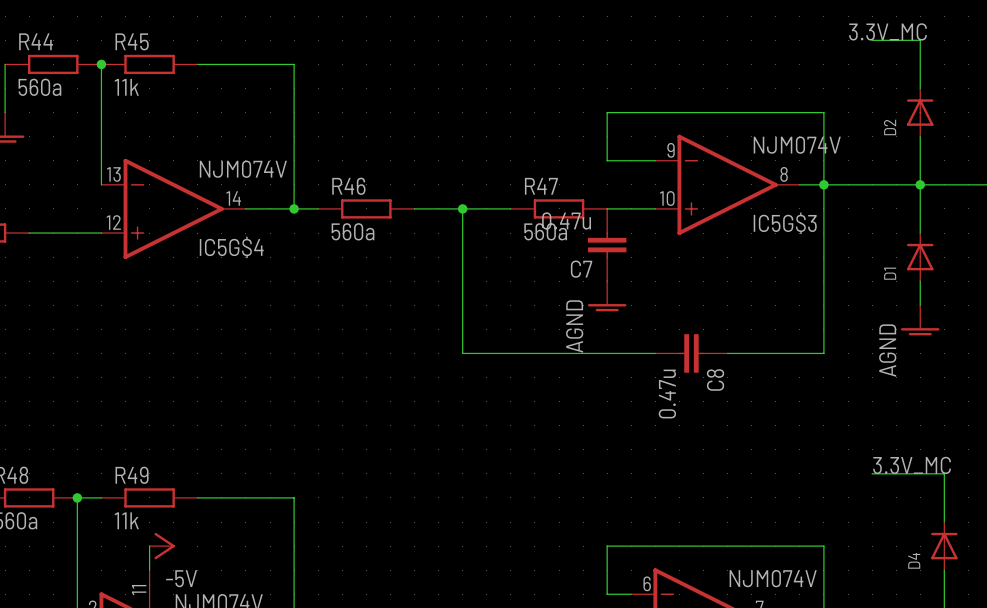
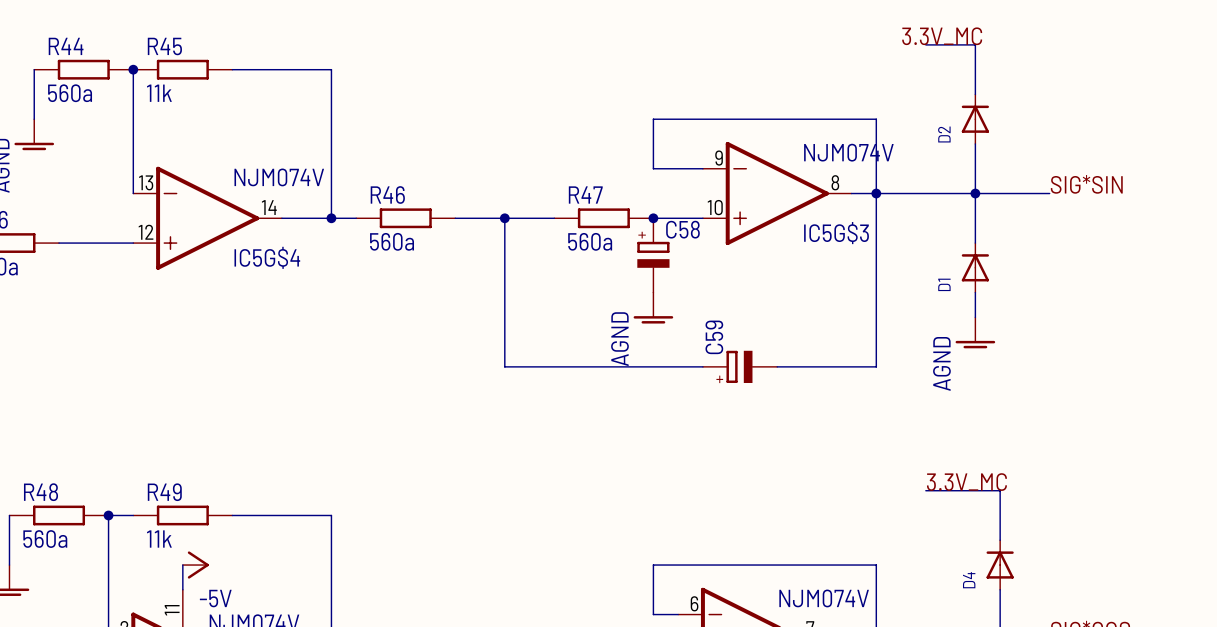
junction: none -> (653, 218)
C7: 0.47u (607, 245) -> none
C58: none -> (653, 255)
C8: 0.47u (691, 353) -> none
C59: none -> (740, 366)

